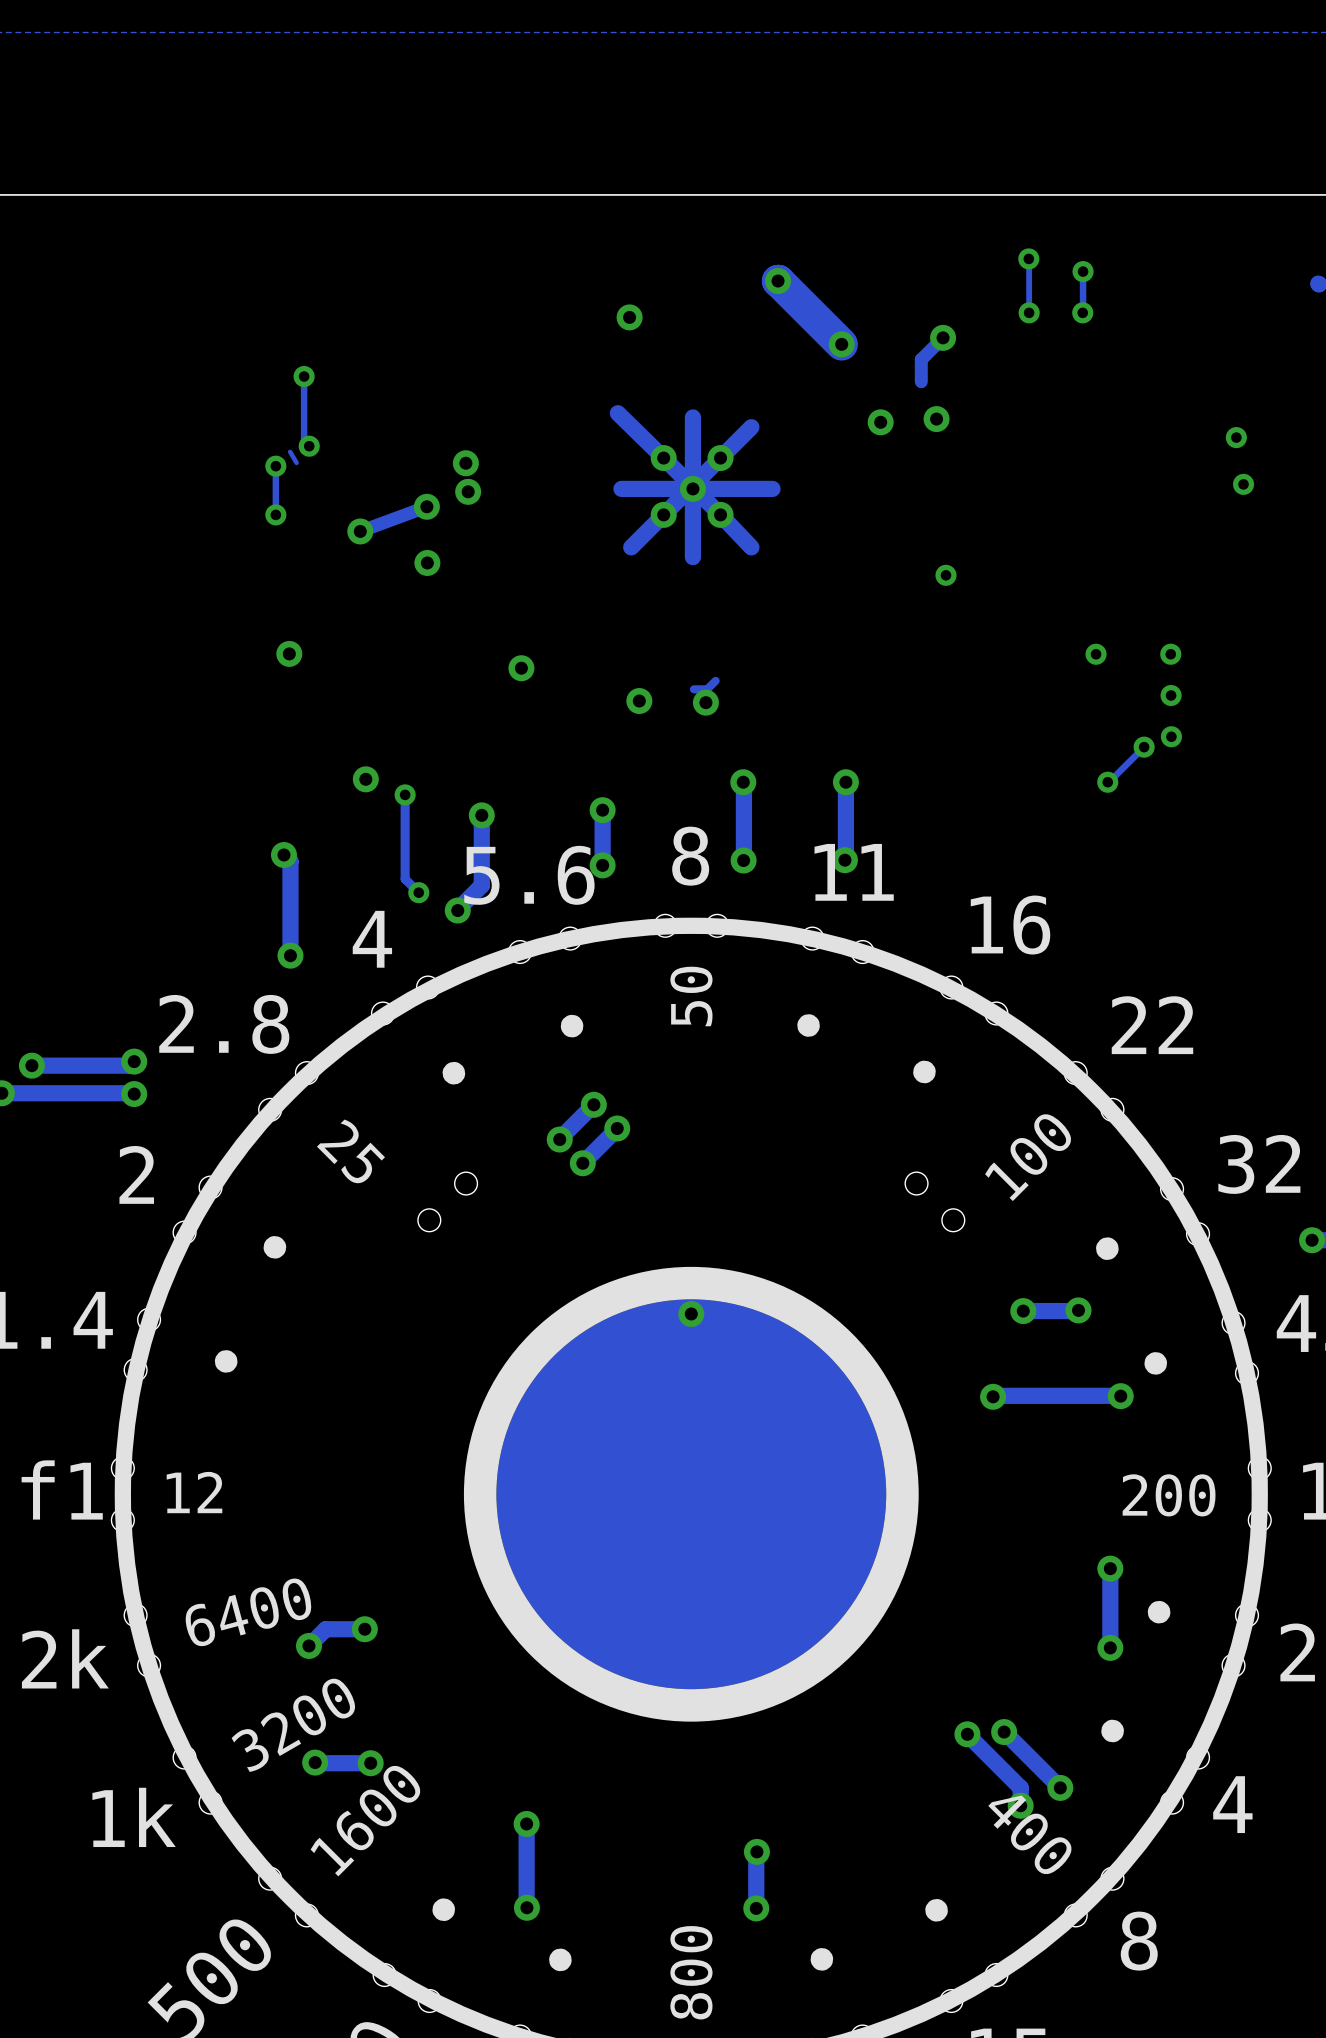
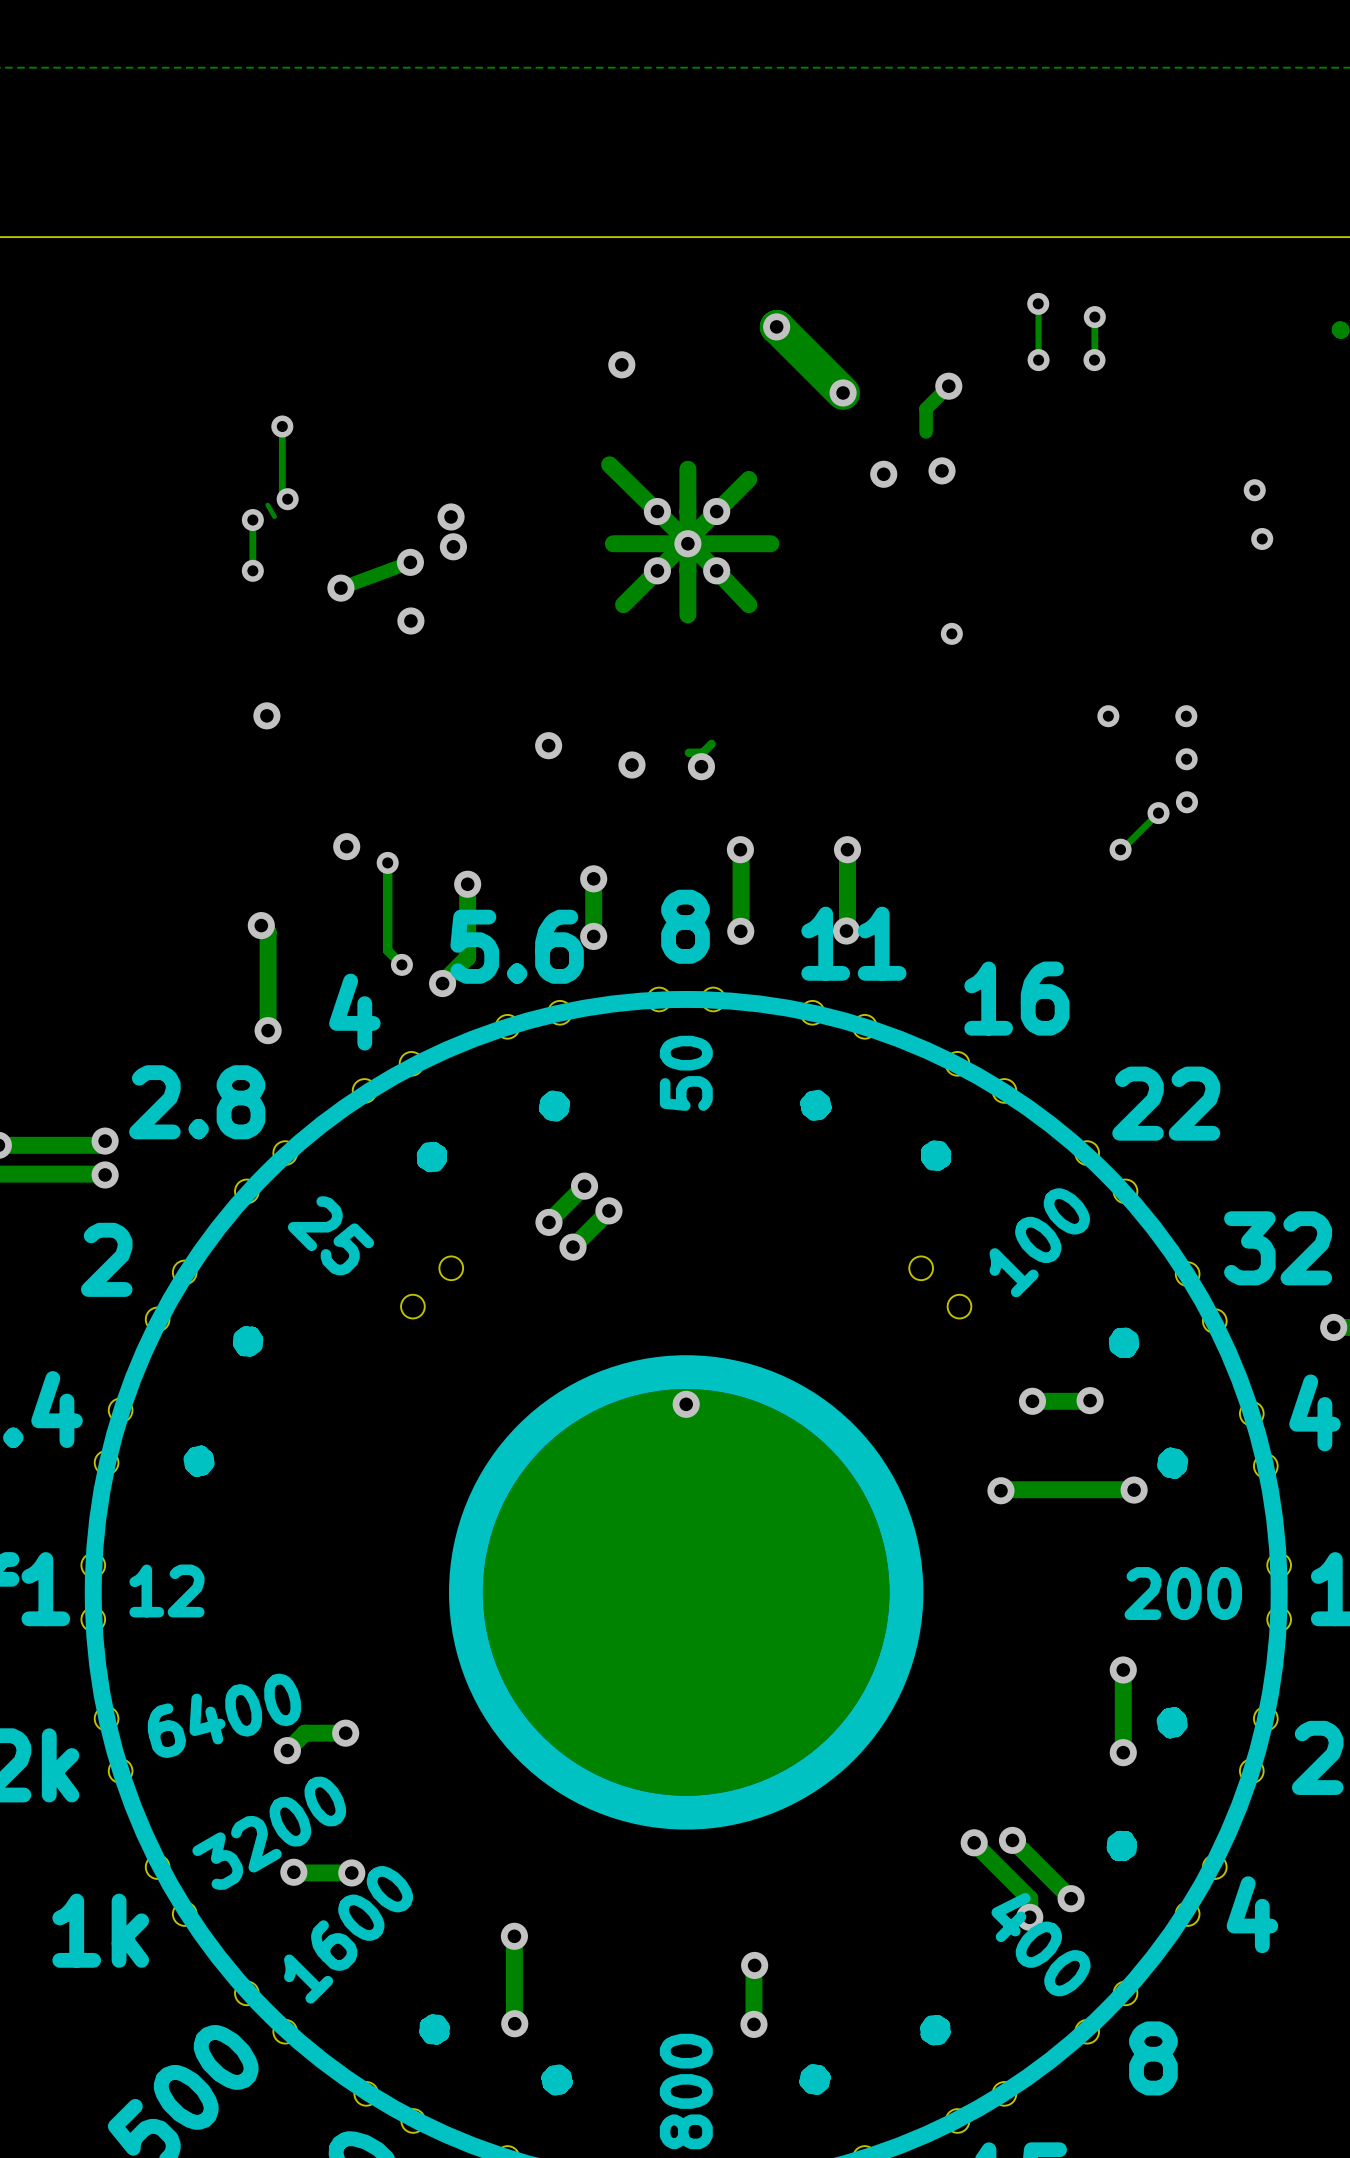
via position: (521, 668) -> (548, 745)

